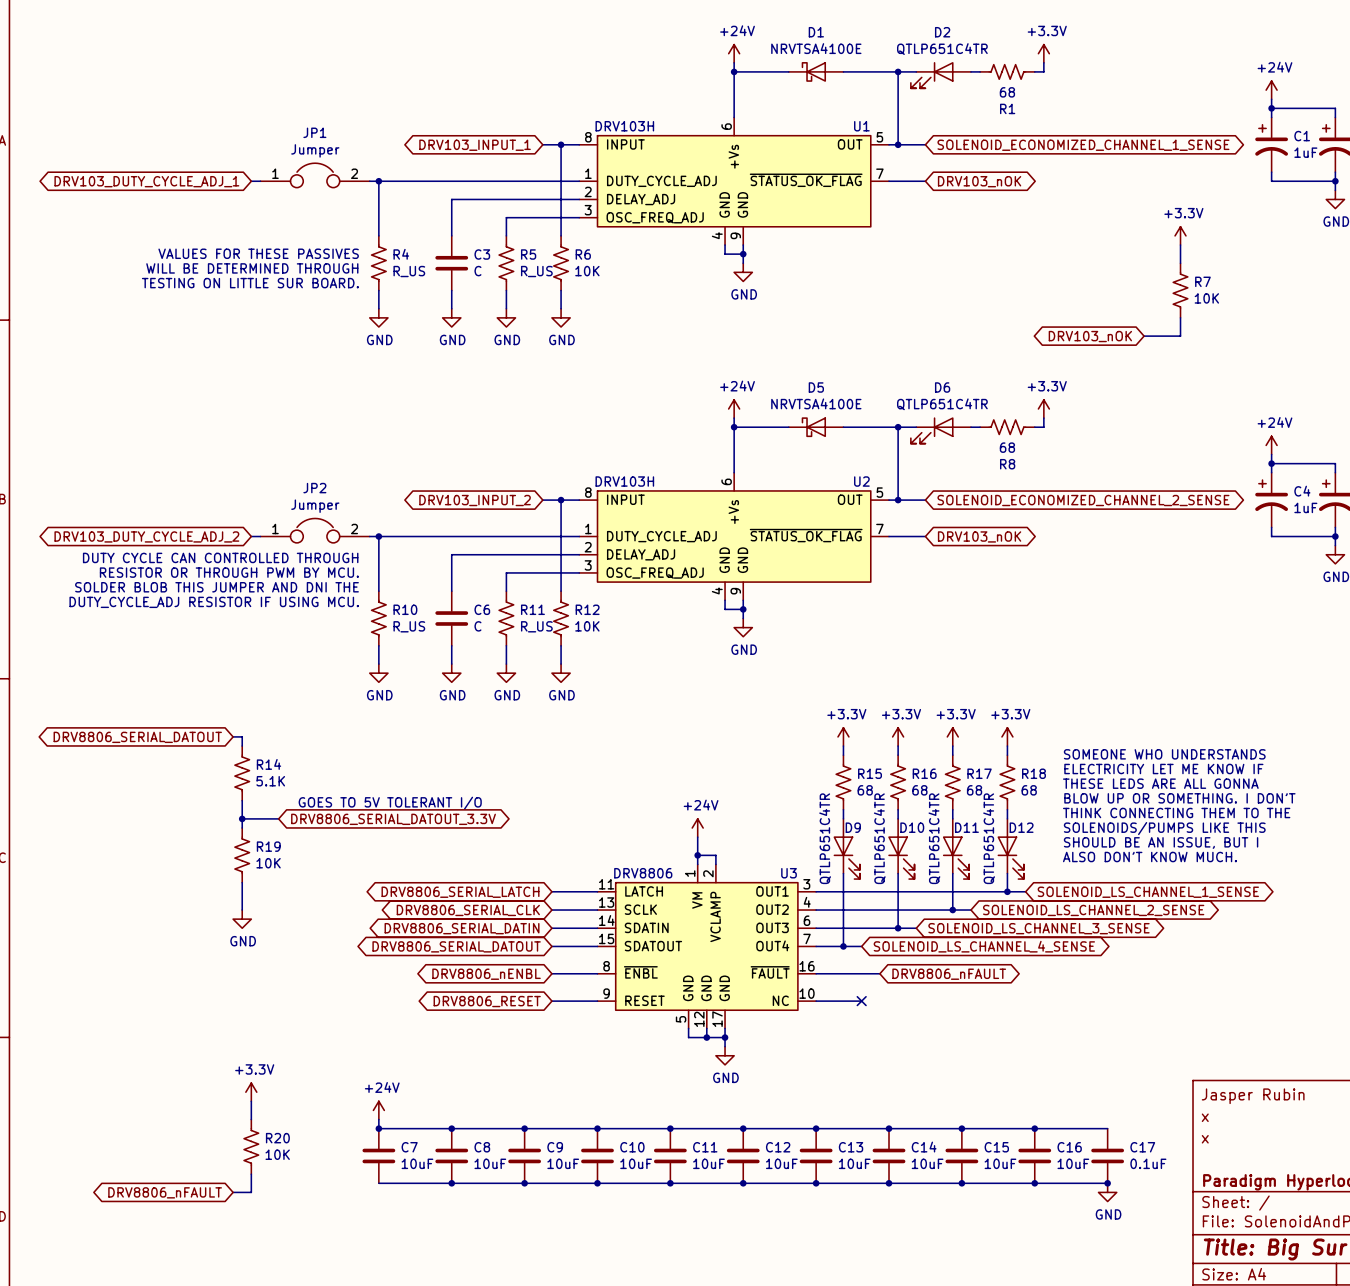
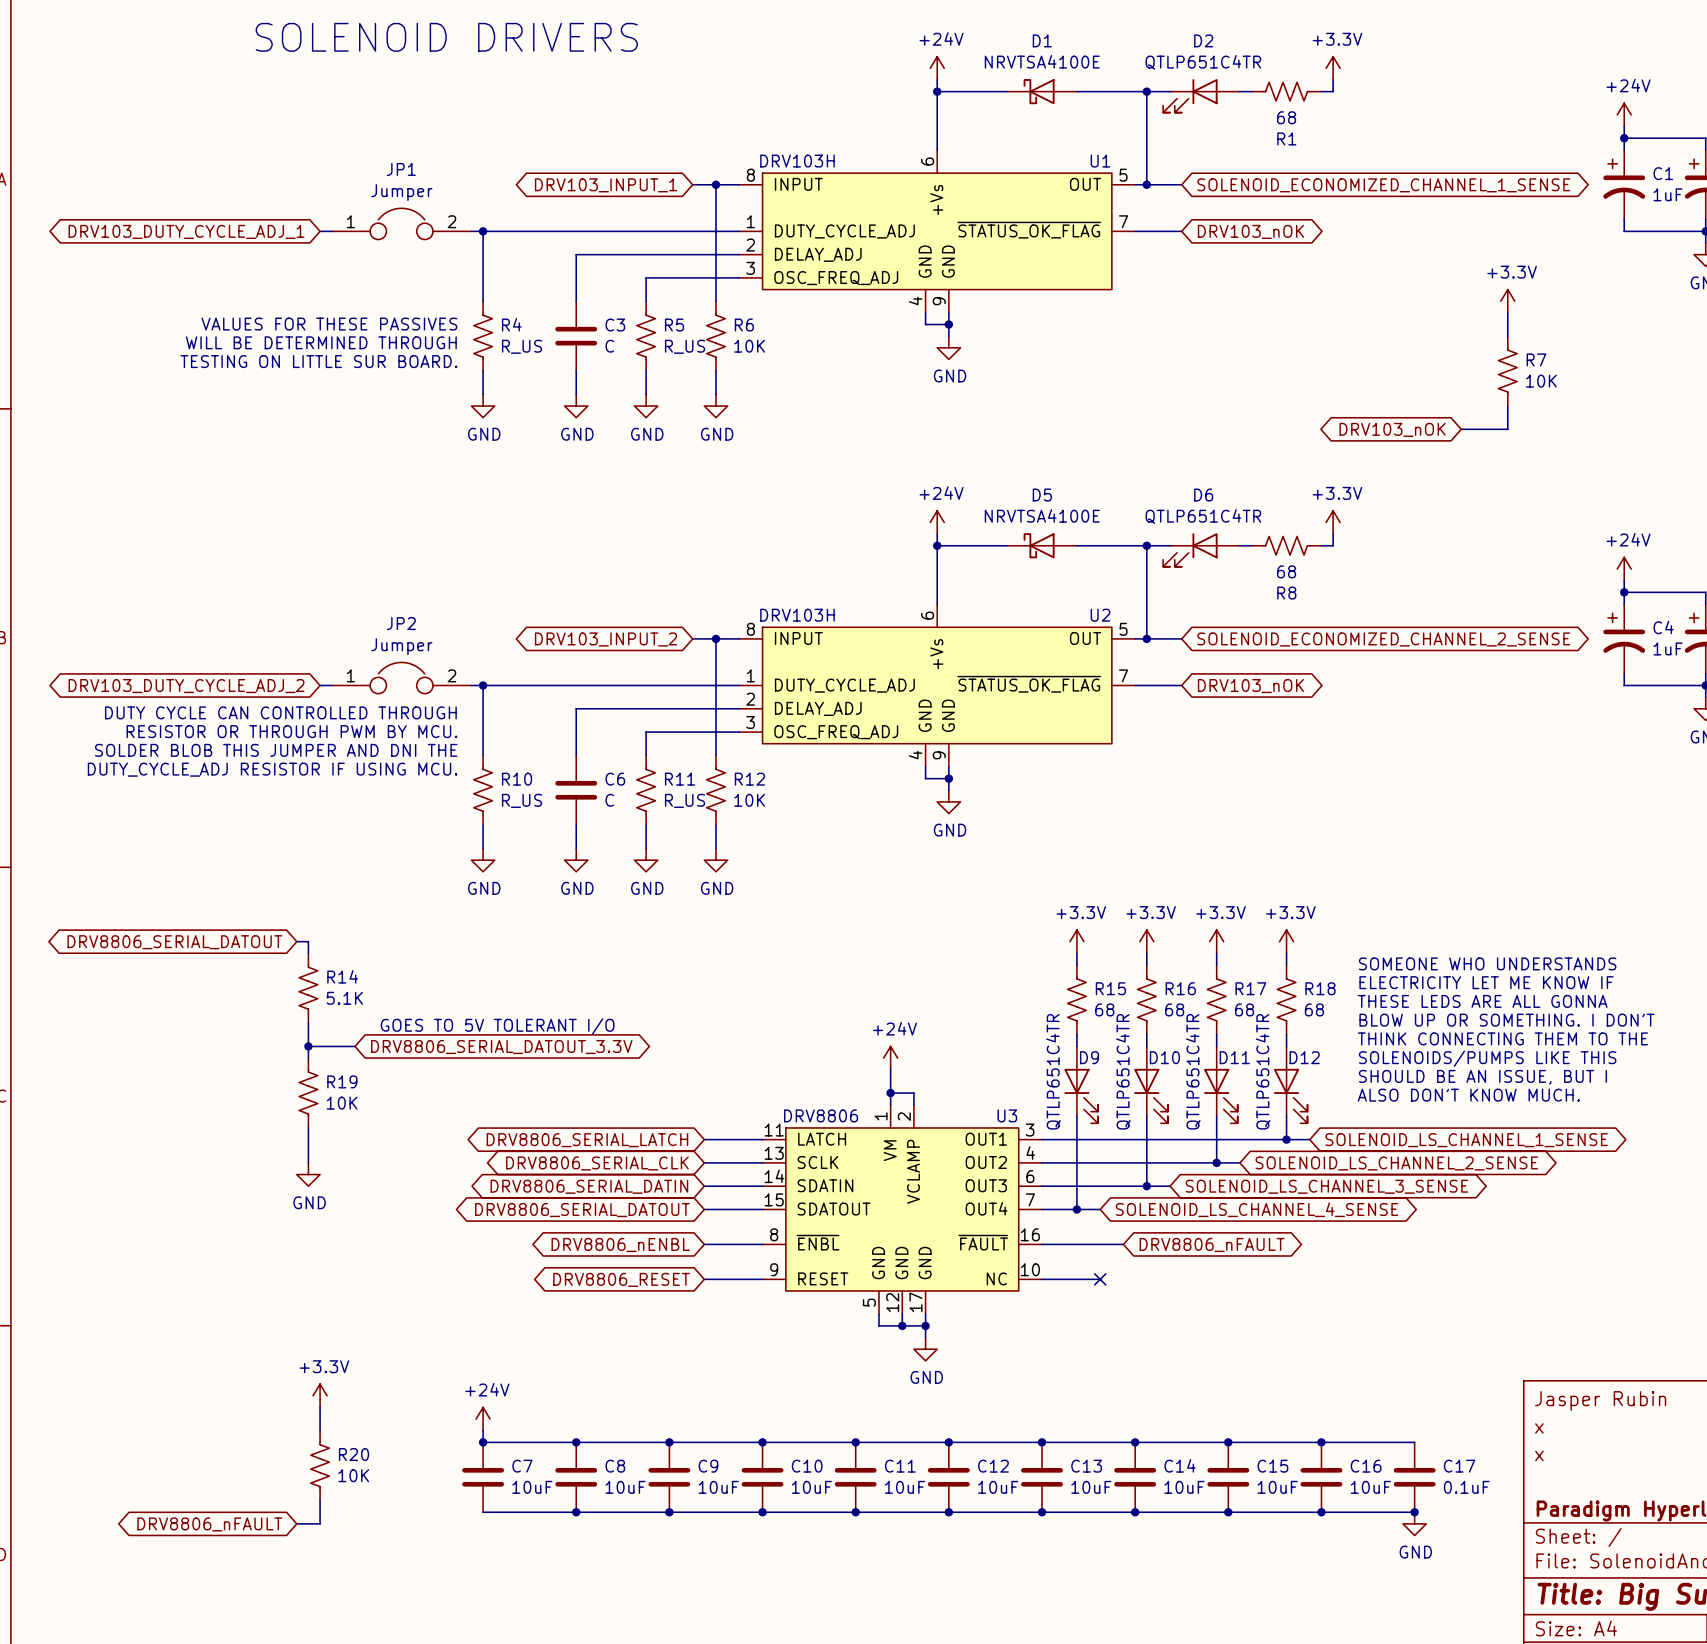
text: none -> SOLENOID DRIVERS (446, 37)

